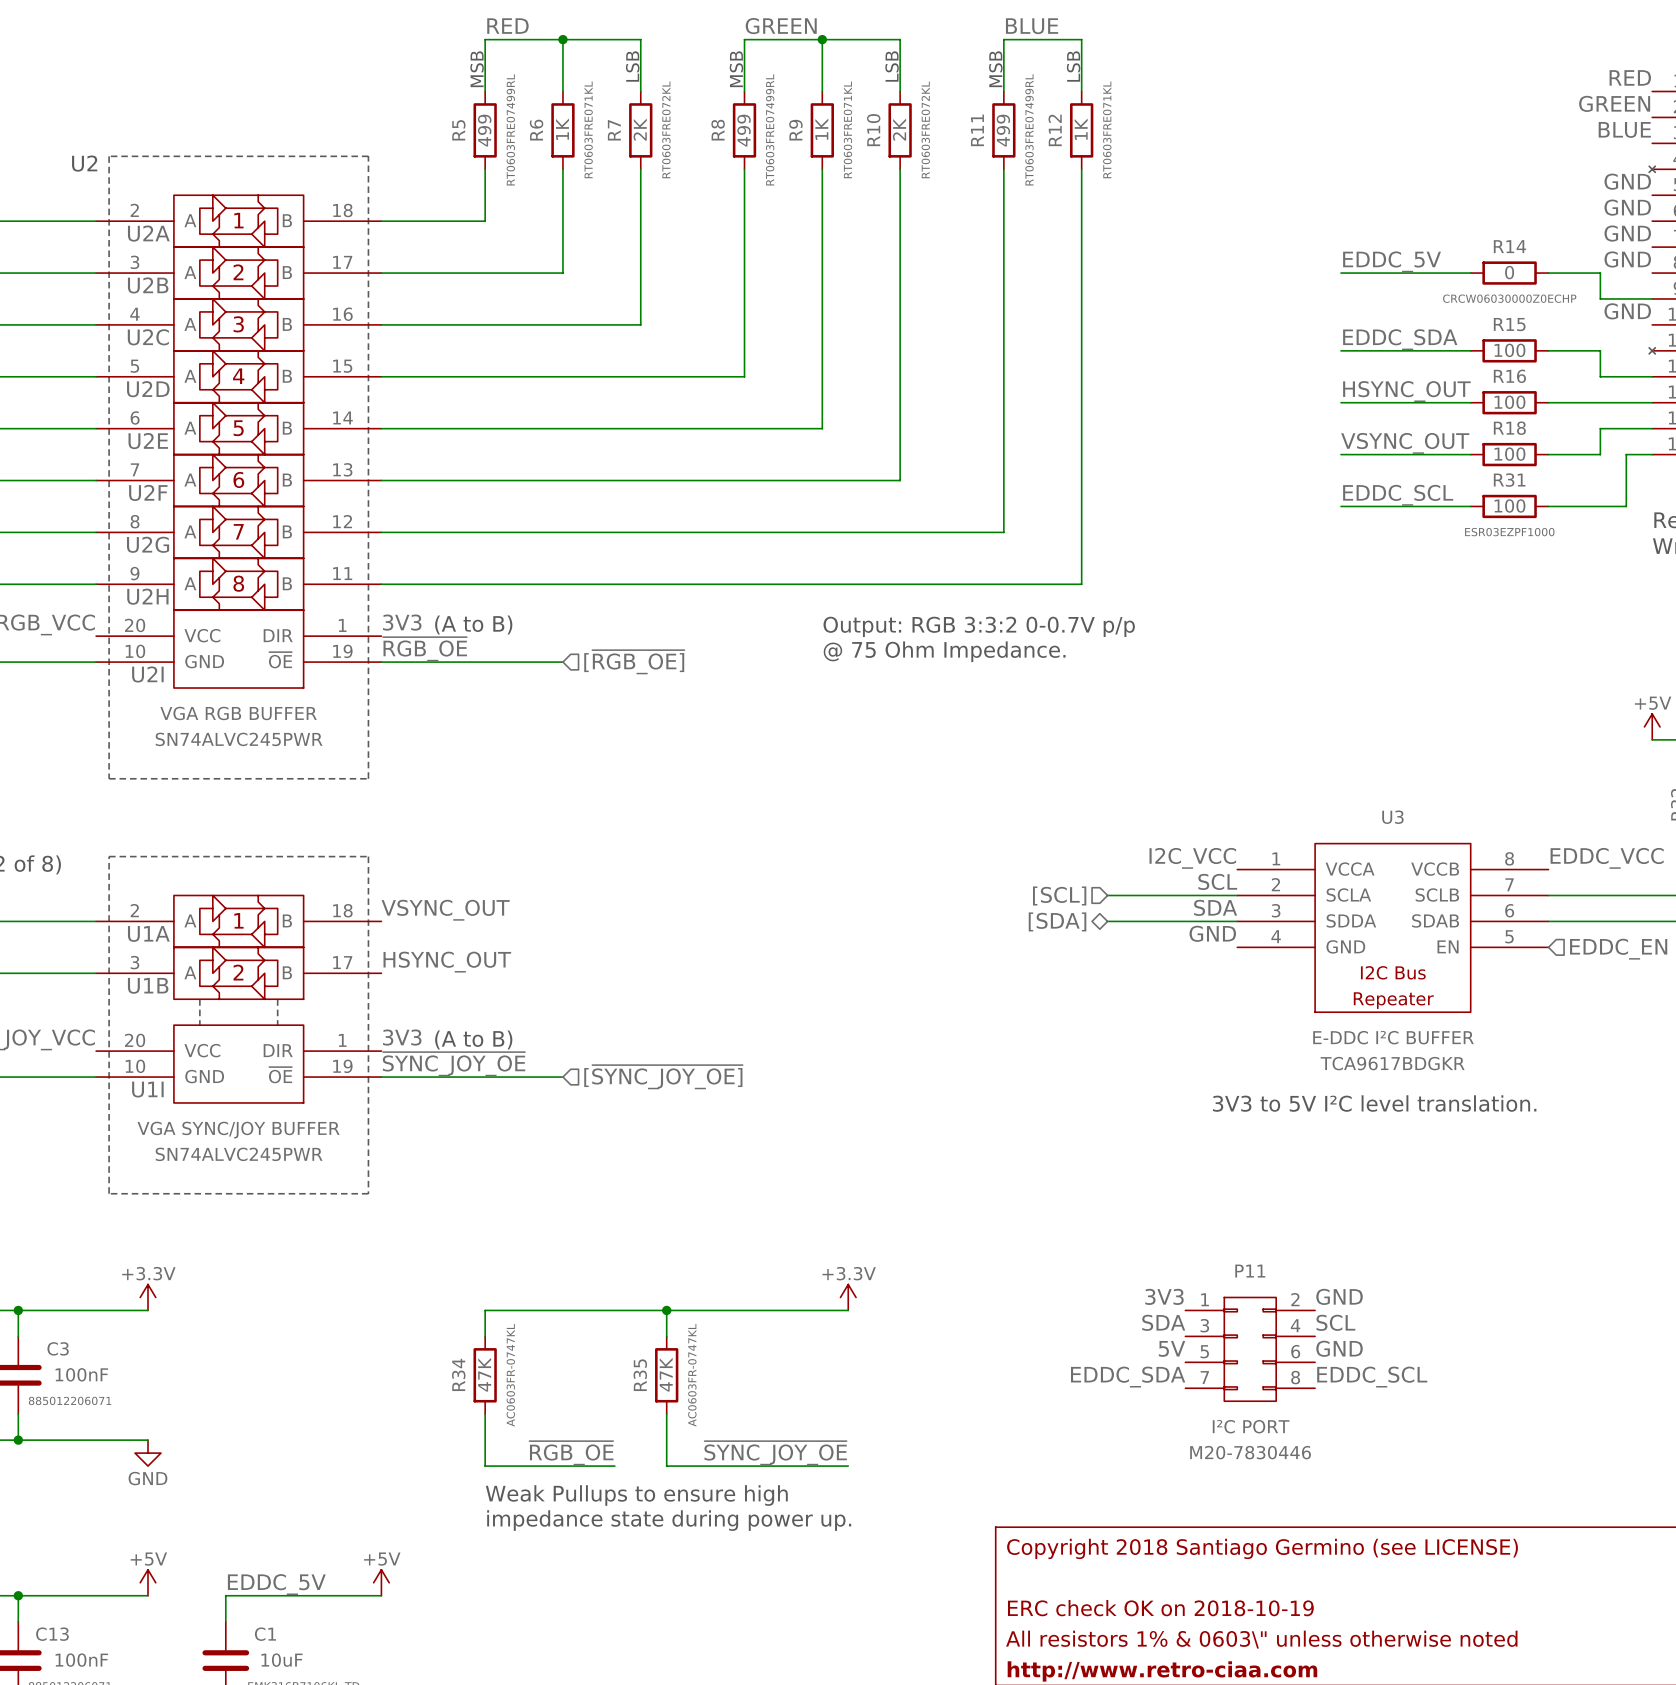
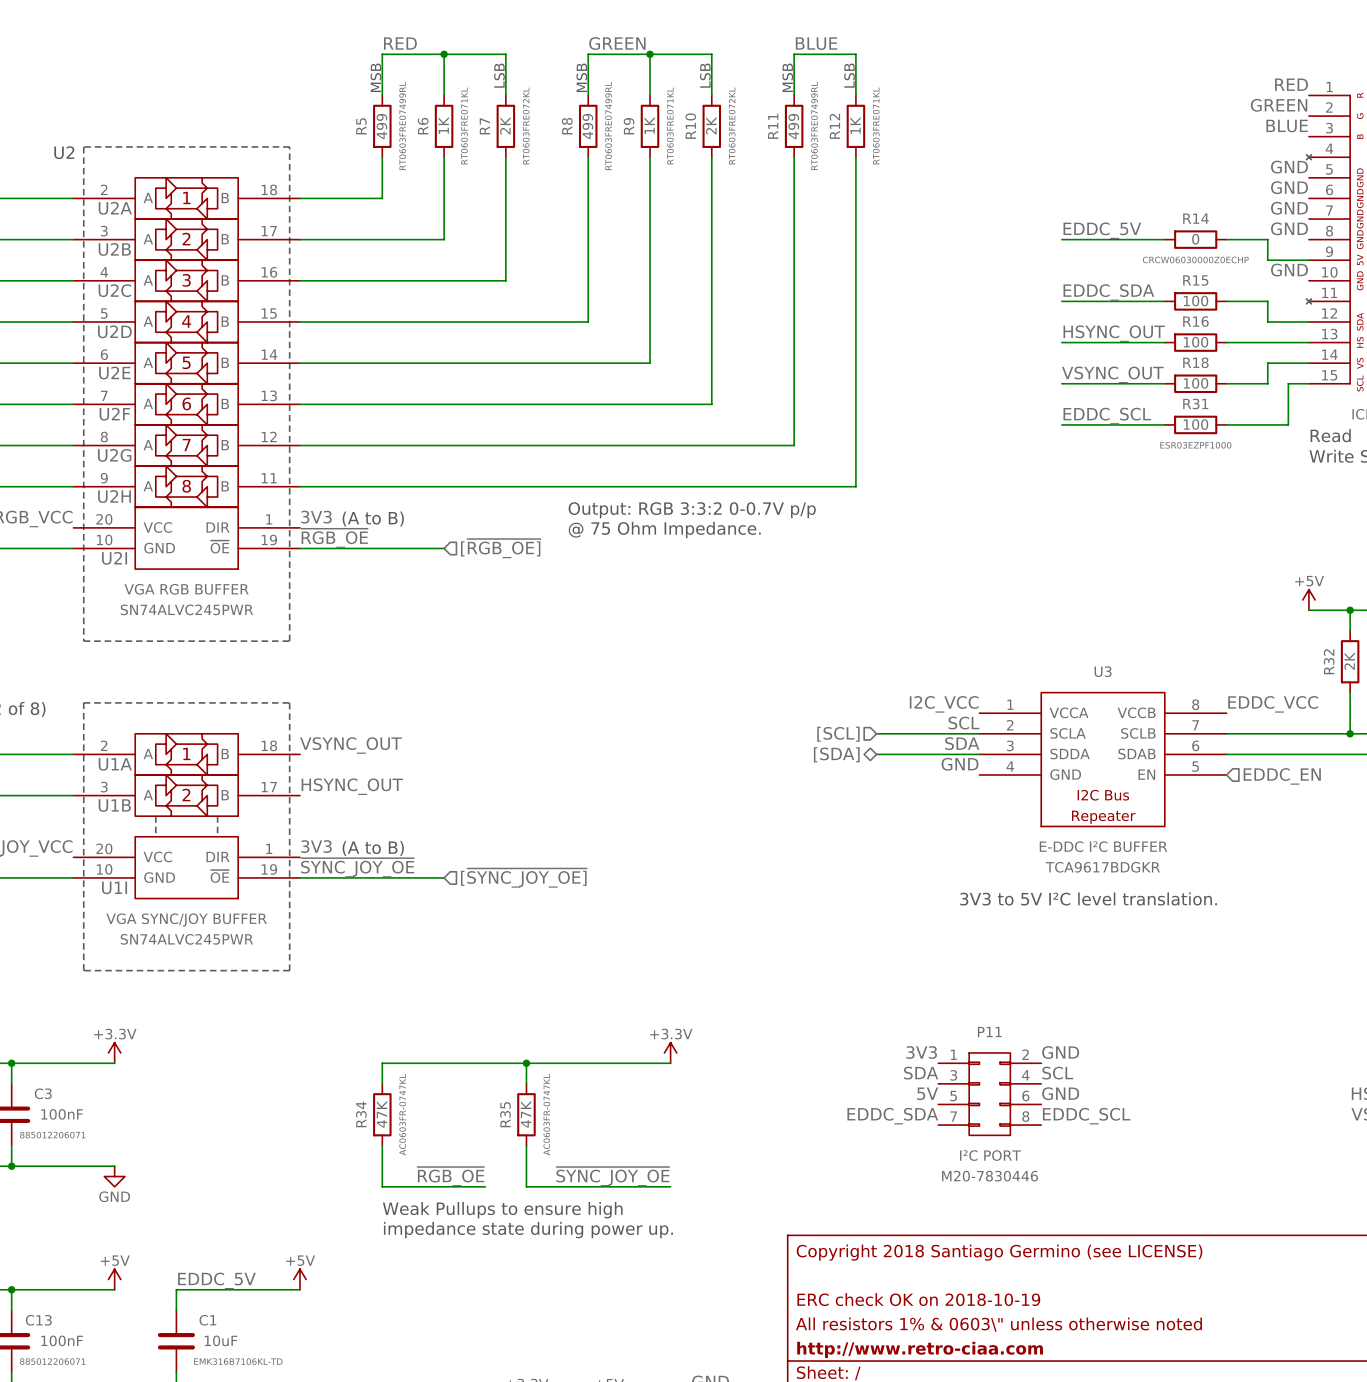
text position: Output: RGB 3:3:2 0-0.7V p/p (979, 626) -> Output: RGB 3:3:2 0-0.7V p/p (692, 510)
text position: @ 75 Ohm Impedance. (944, 651) -> @ 75 Ohm Impedance. (664, 529)

